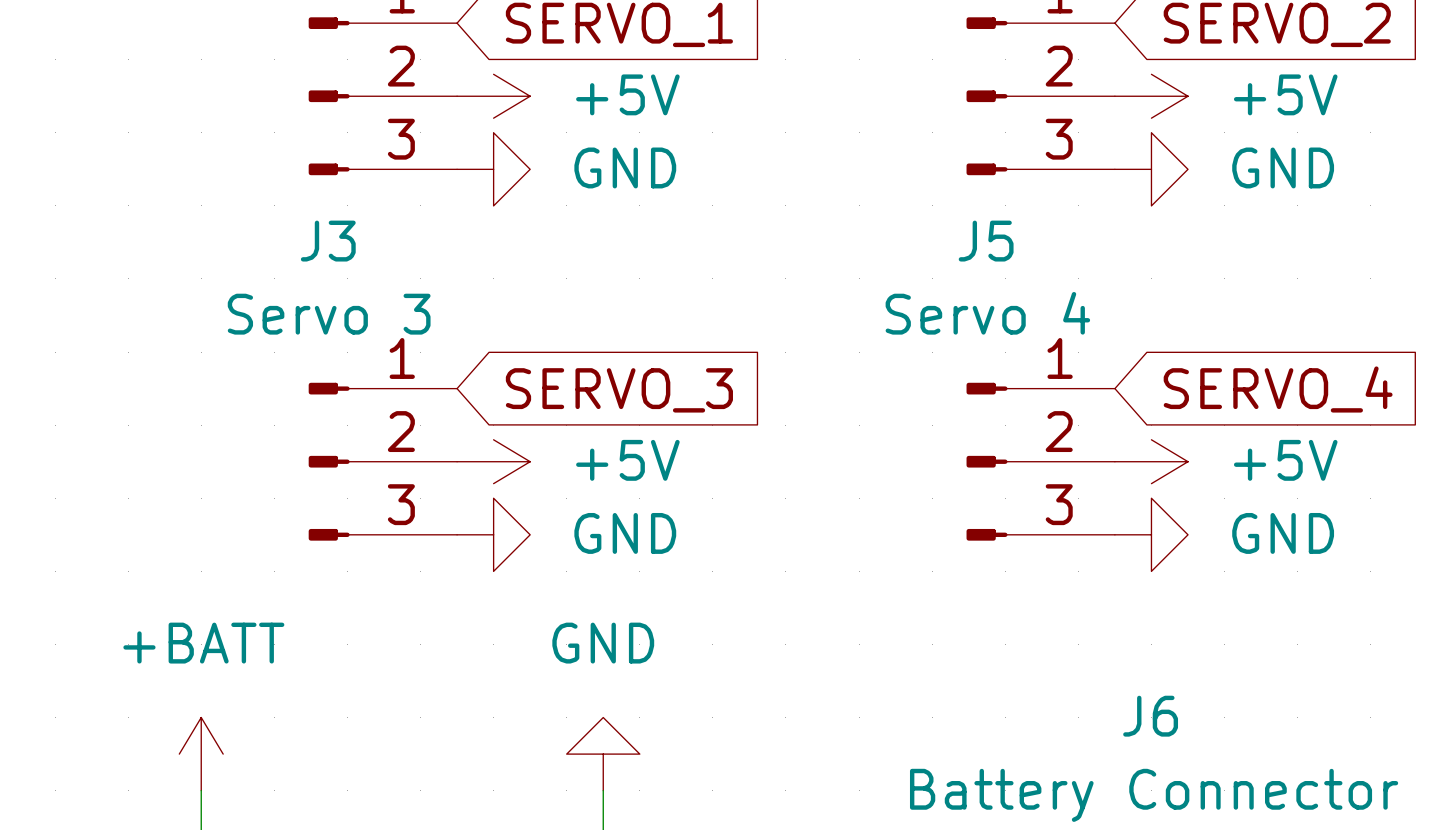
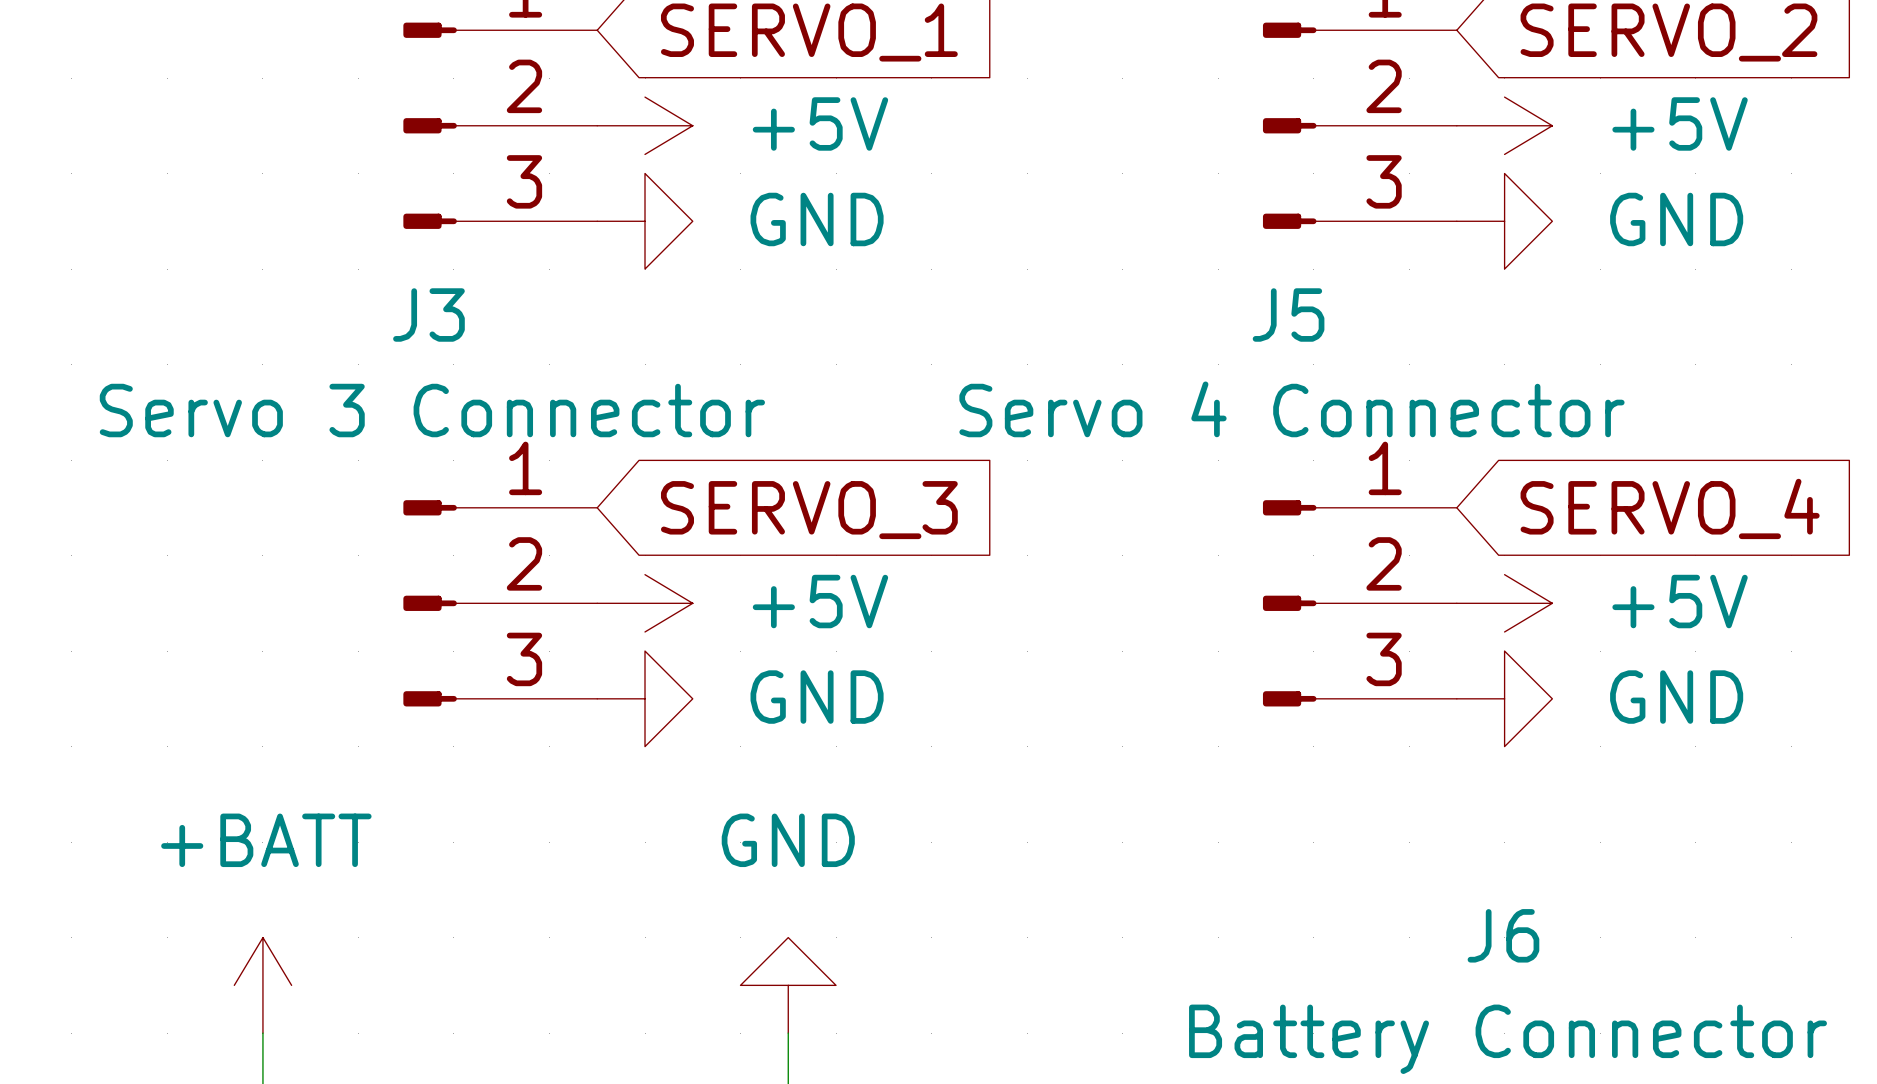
J5 value: Servo 4 (987, 313) -> Servo 4 Connector (1291, 409)
J3 value: Servo 3 (329, 314) -> Servo 3 Connector (432, 410)

